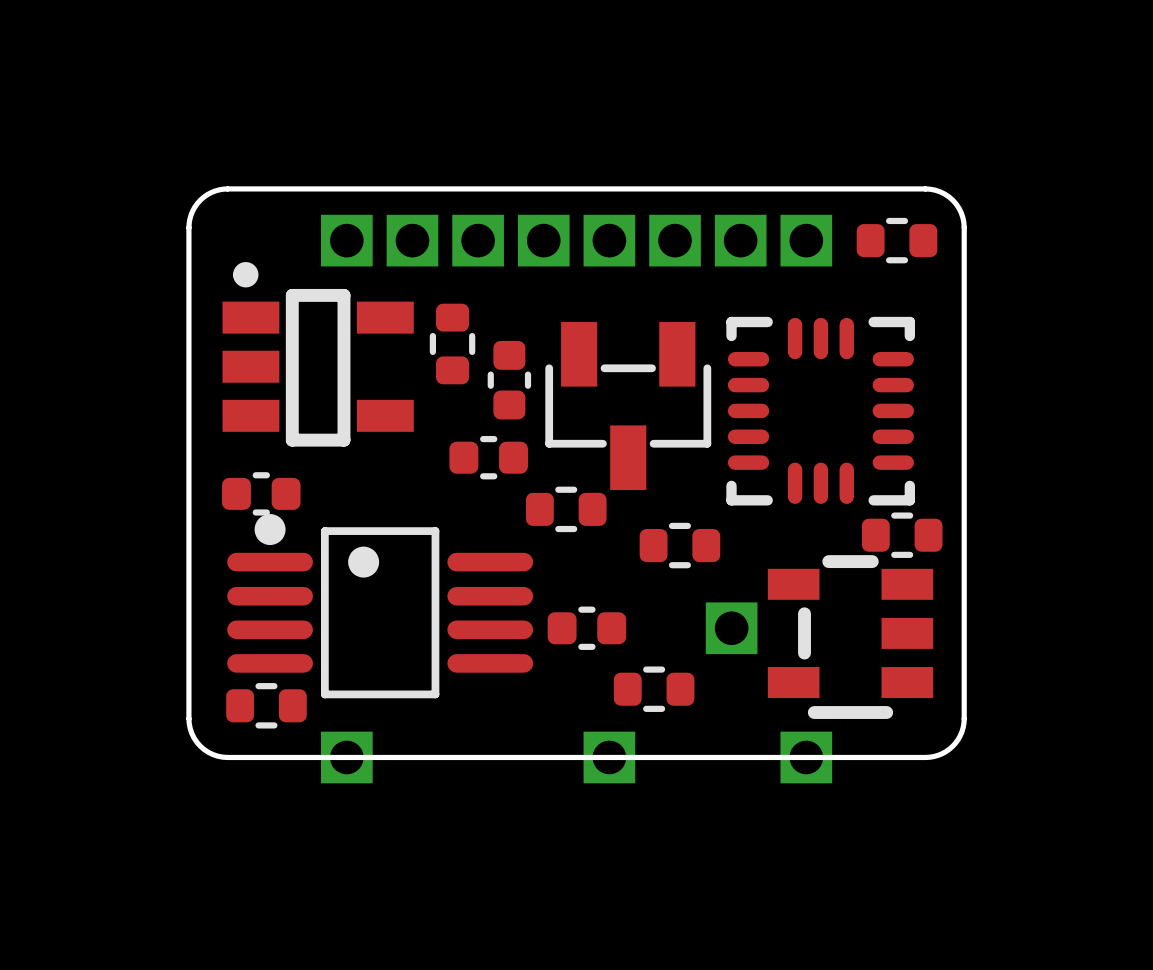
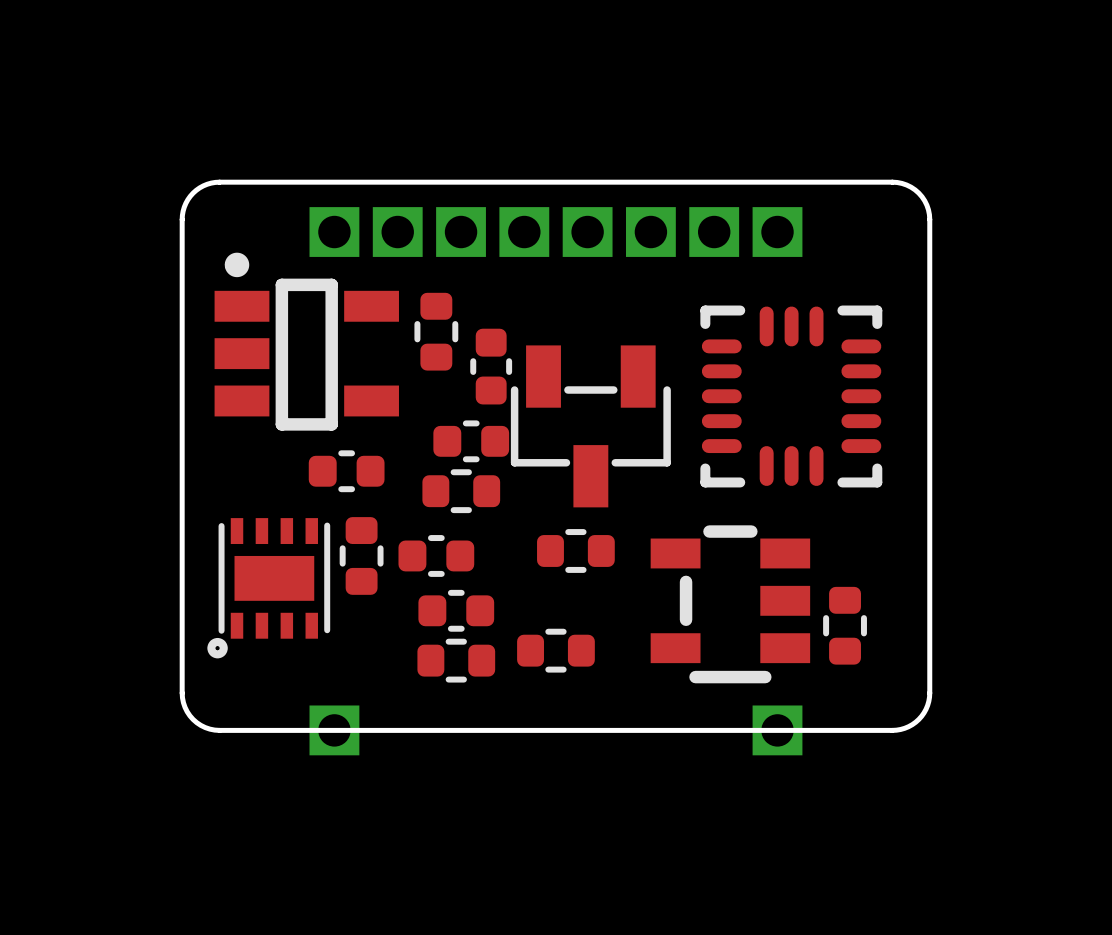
part: (897, 240) -> none
part position: (628, 406) -> (590, 426)
part position: (261, 493) -> (346, 471)
part: none -> (461, 491)
part: (566, 509) -> none
part footprint: [227, 514, 534, 699] -> [339, 517, 384, 595]
part: (902, 535) -> none
part: (679, 545) -> none
part footprint: [767, 555, 934, 719] -> [823, 586, 867, 665]
part: none -> (575, 550)
part: none -> (436, 555)
part footprint: [705, 602, 758, 655] -> [650, 525, 811, 684]
part: none -> (268, 588)
part: (586, 628) -> none
part: none -> (456, 610)
part: none -> (555, 650)
part: none -> (456, 660)
part: (654, 689) -> none
part: (266, 705) -> none
part: (609, 757) -> none

